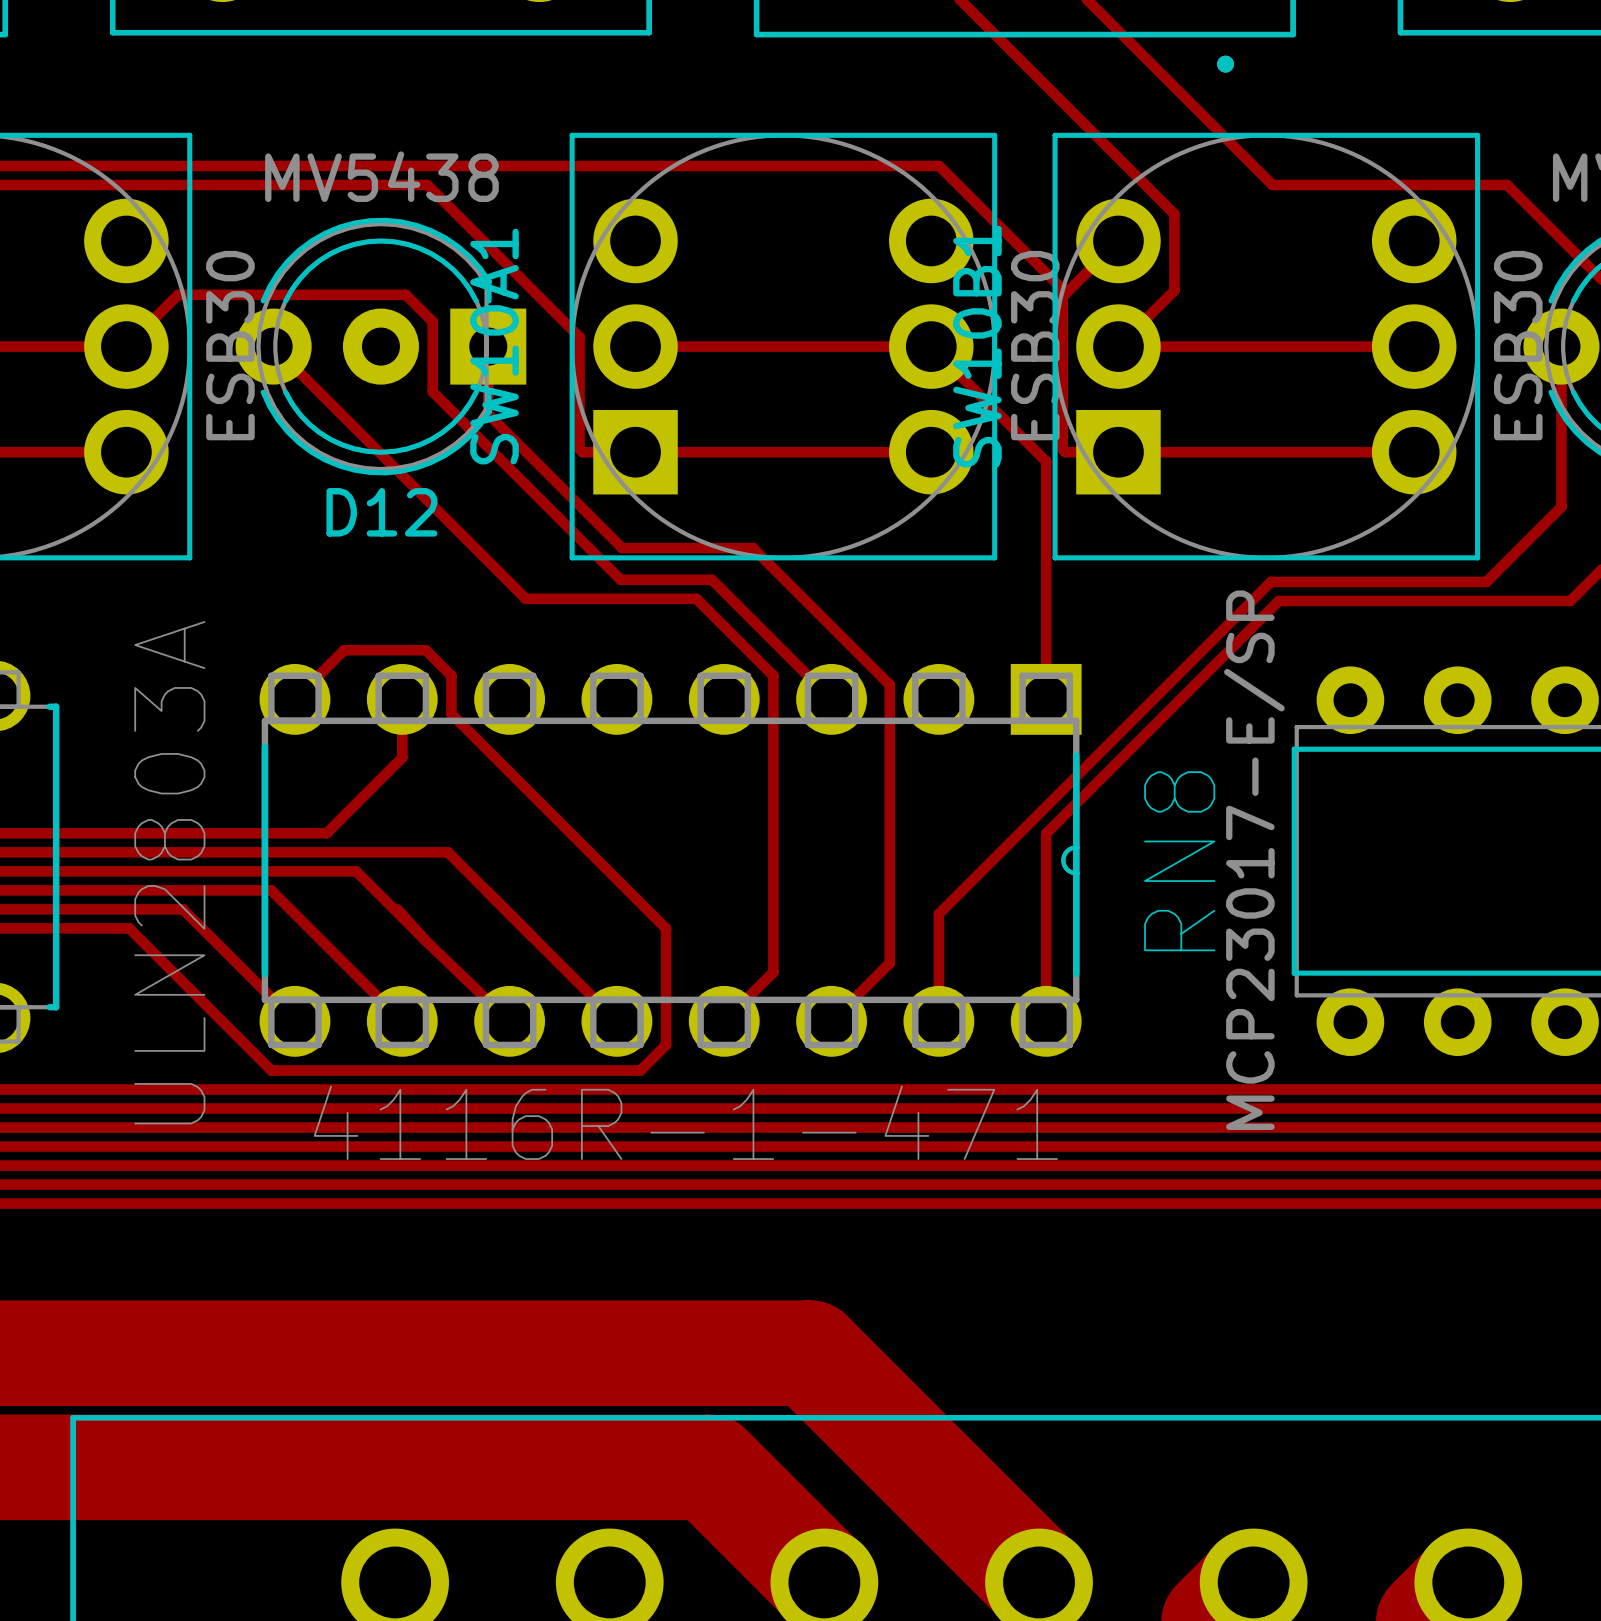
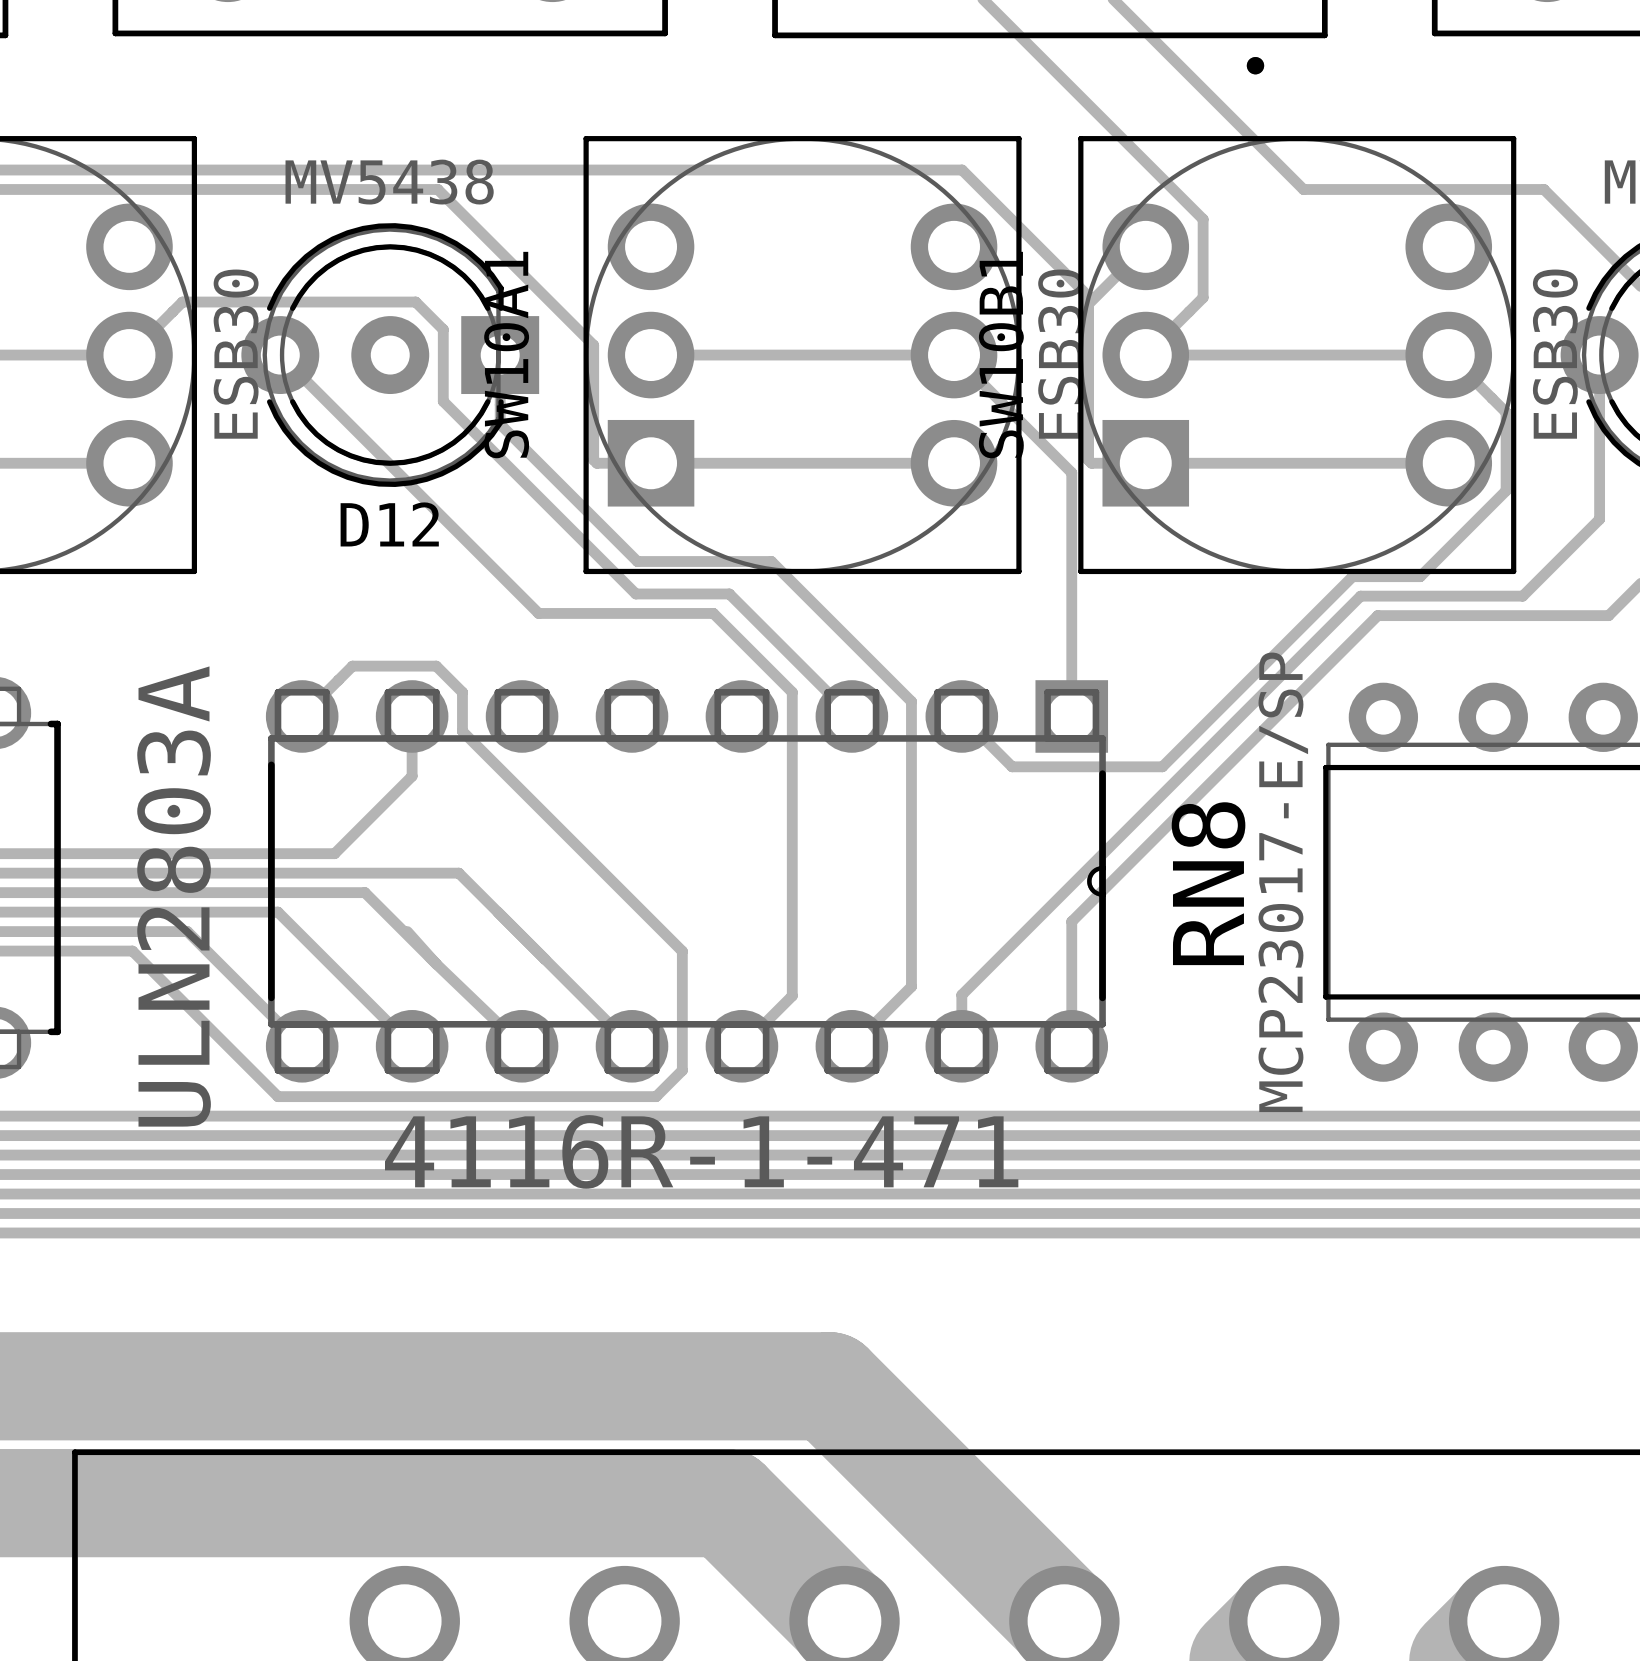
track: none -> (1448, 355) (1506, 412) (1506, 490) (1420, 576) (1352, 576) (1162, 766) (1012, 766) (961, 716)
track: (1328, 581) (1270, 581) (938, 914) (938, 971) -> (1360, 596) (961, 994)
track: (1344, 600) (1278, 600) (1046, 833) (1046, 899) -> (1377, 615) (1071, 921)

